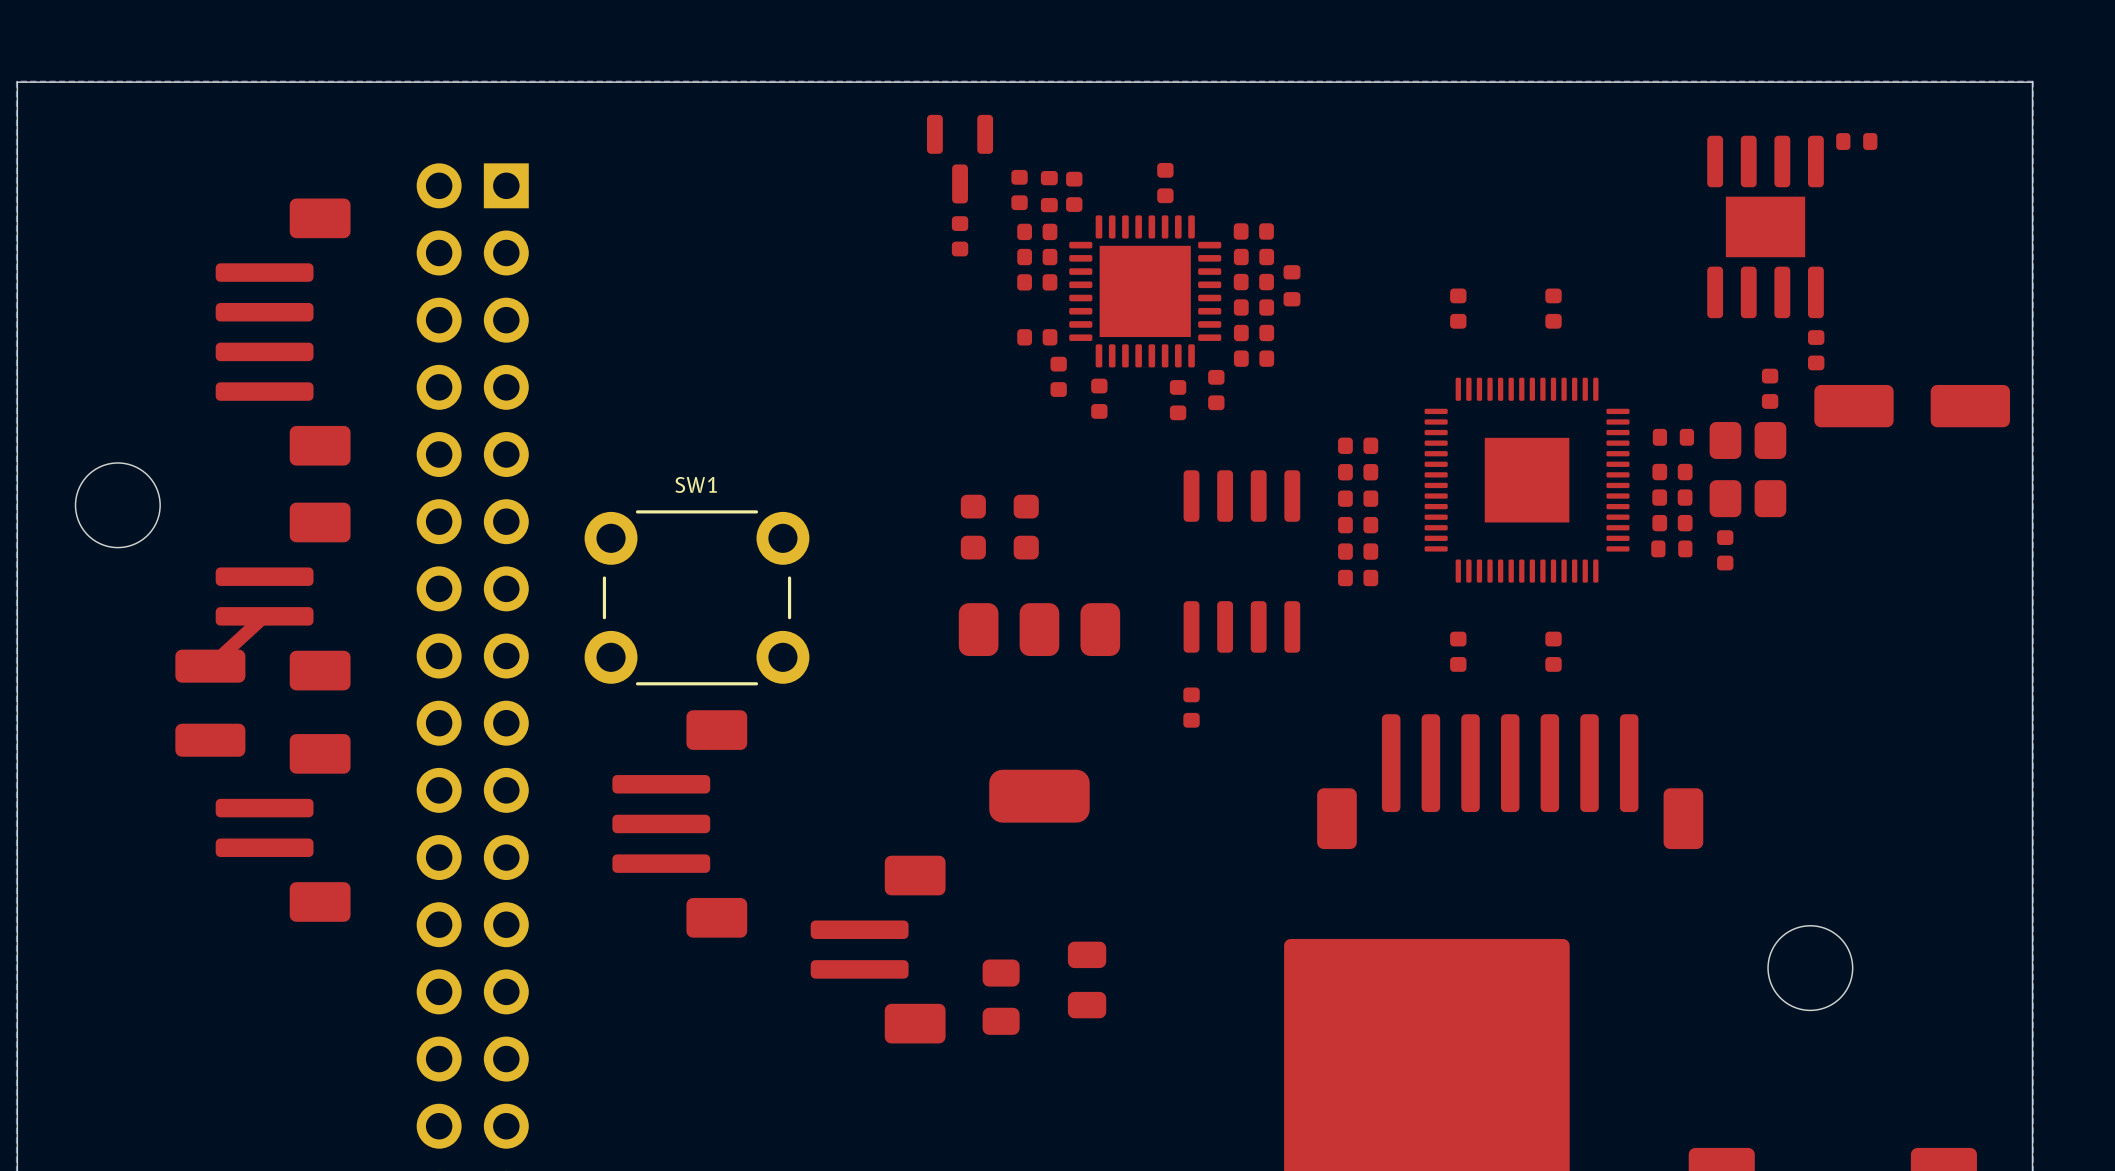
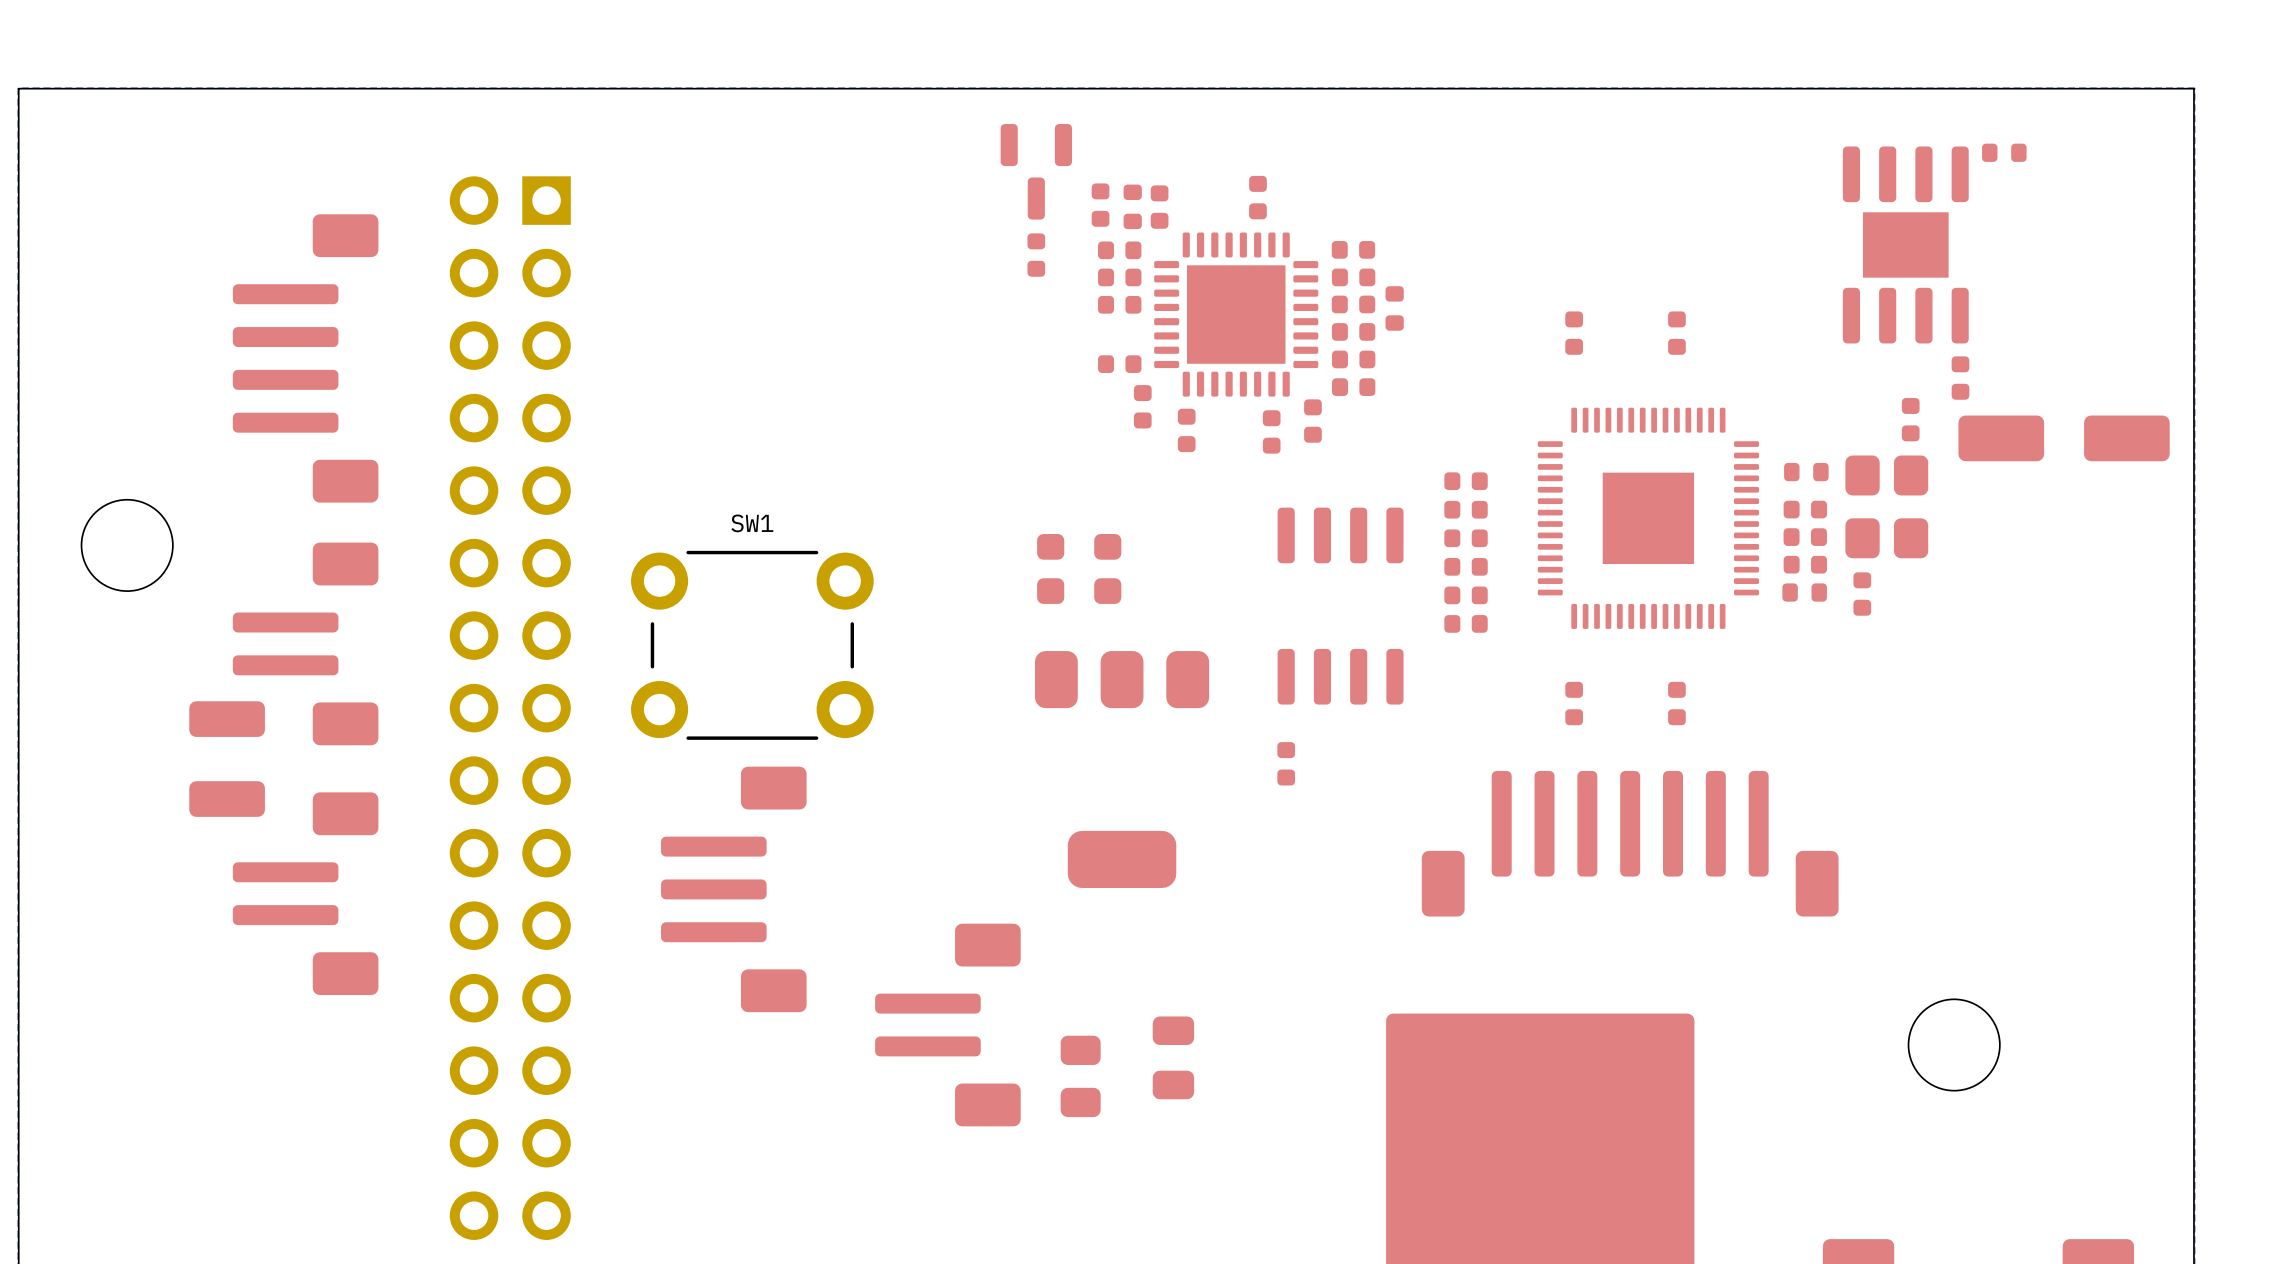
top track: (264, 616) (210, 666) -> none

